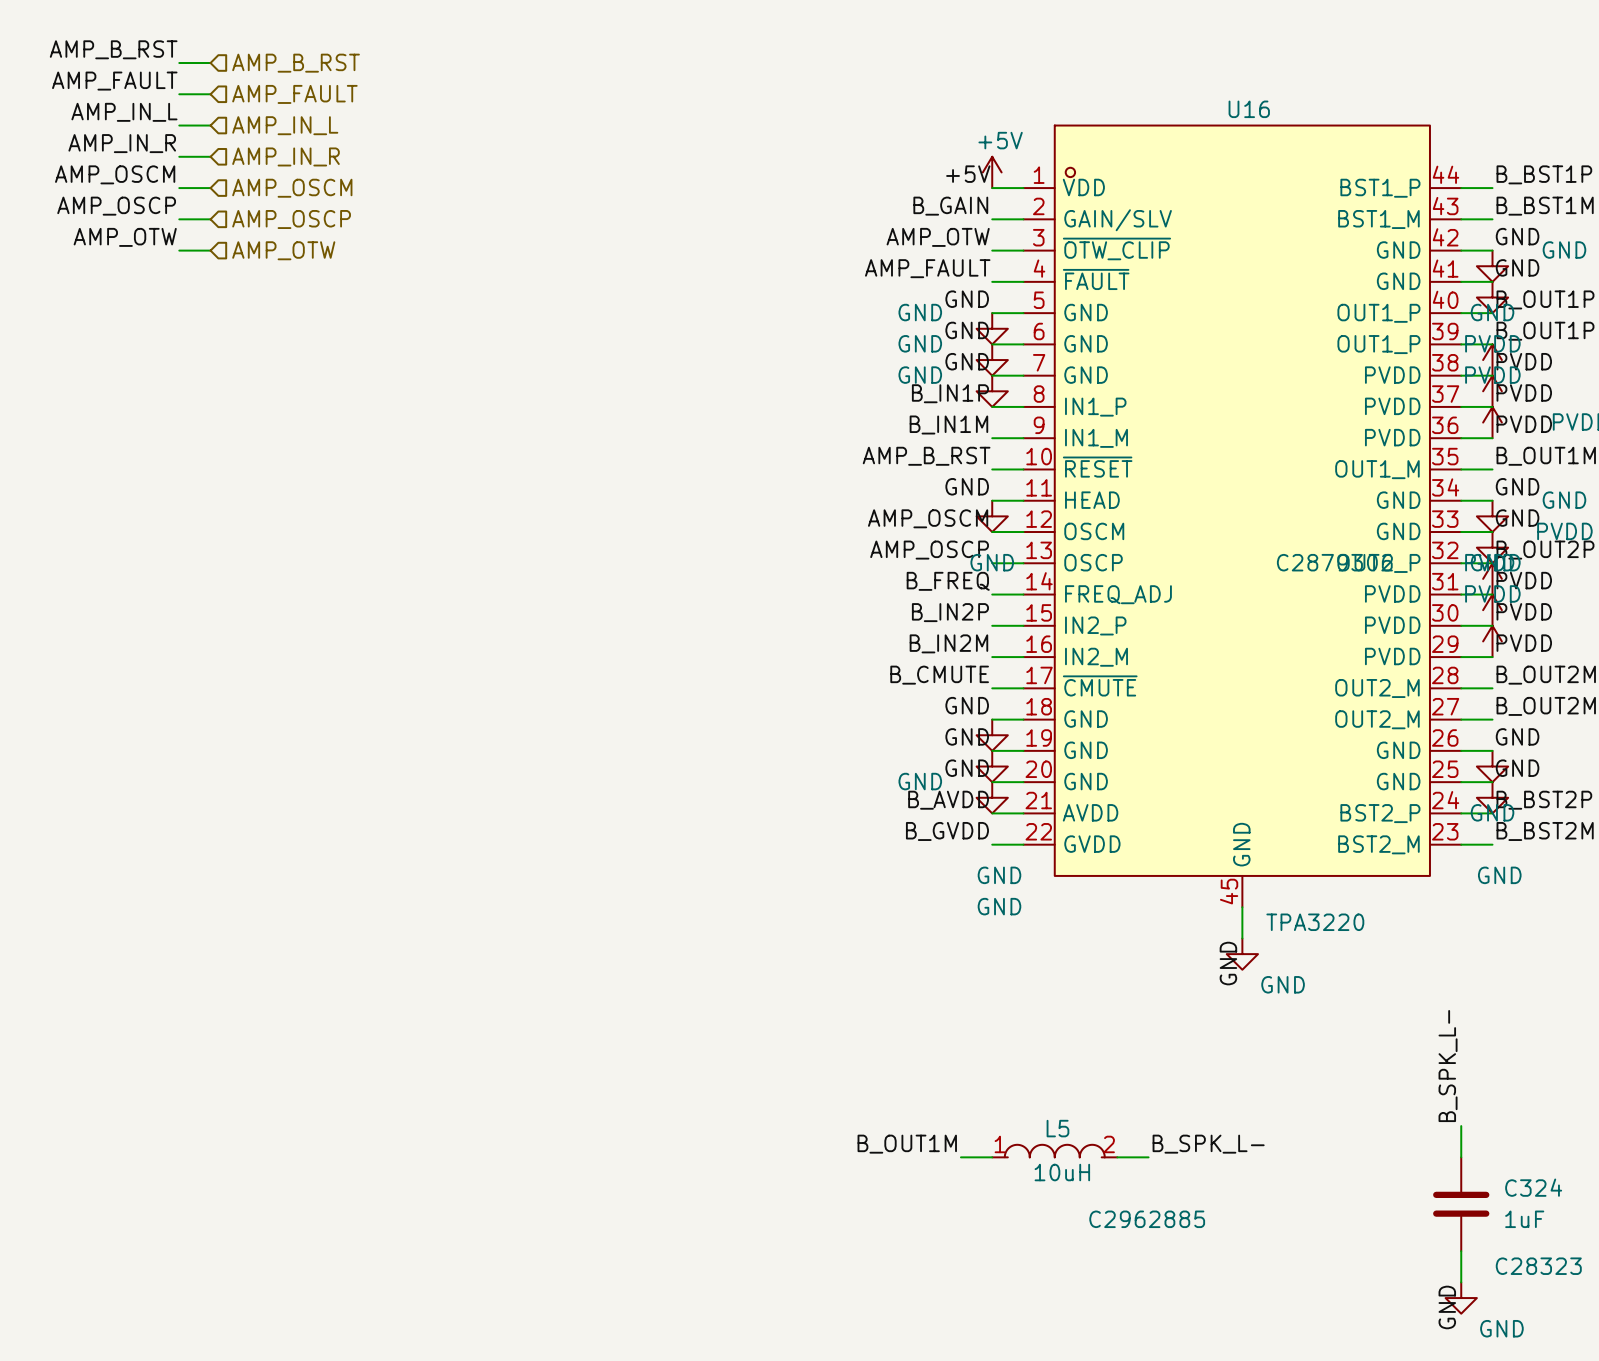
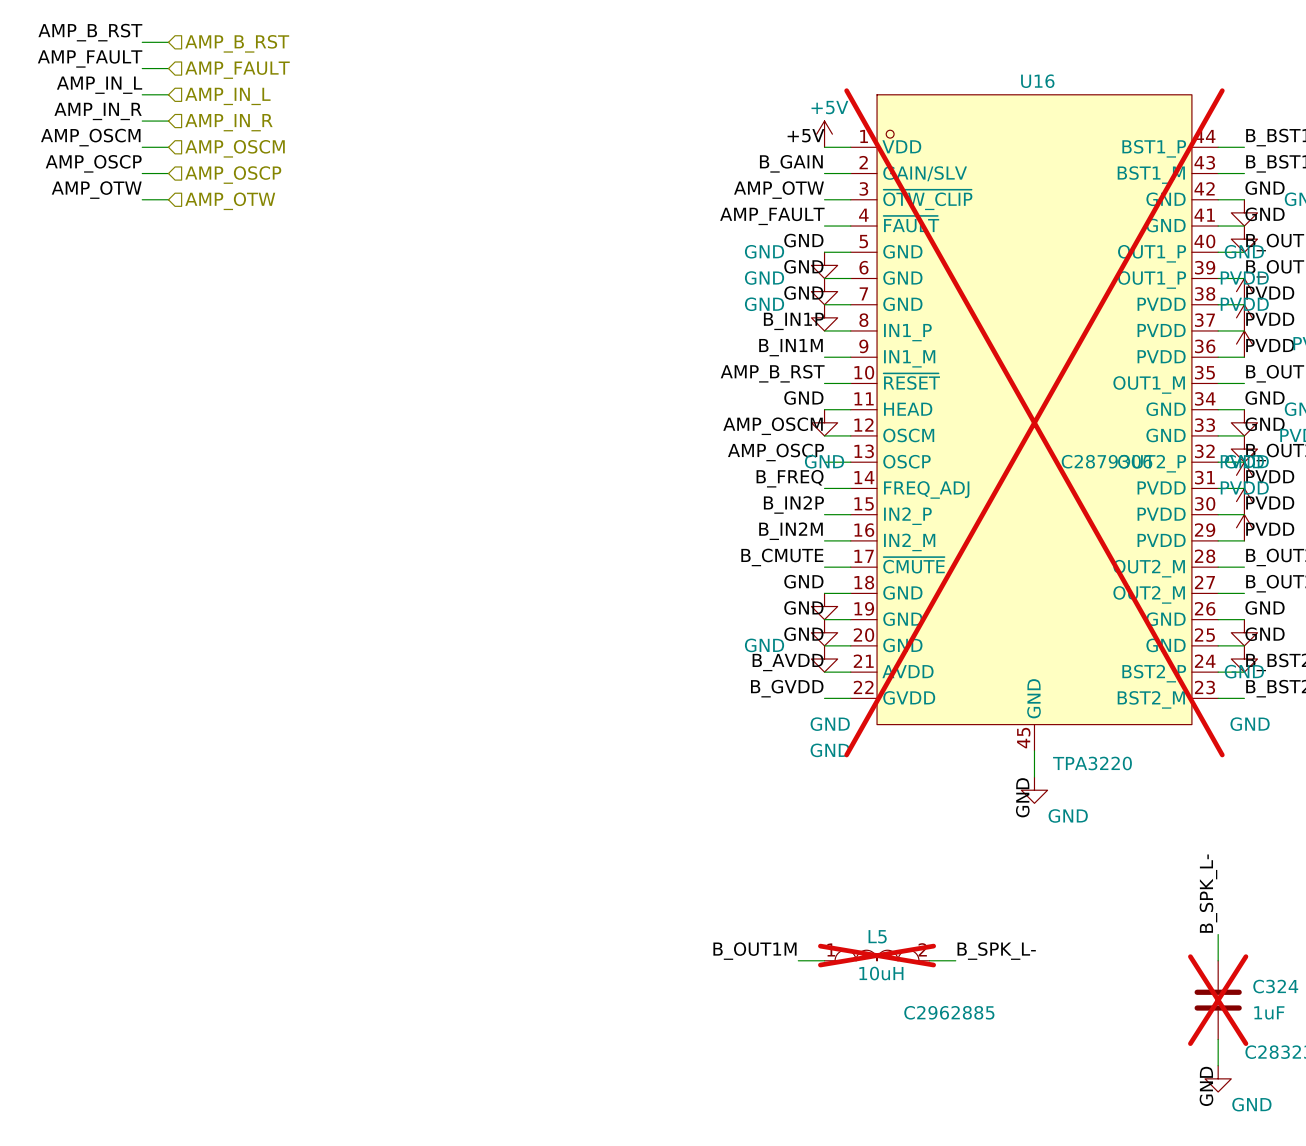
U16 do-not-place cross: none -> (1034, 422)
L5 do-not-place cross: none -> (877, 955)
C324 do-not-place cross: none -> (1218, 1000)

